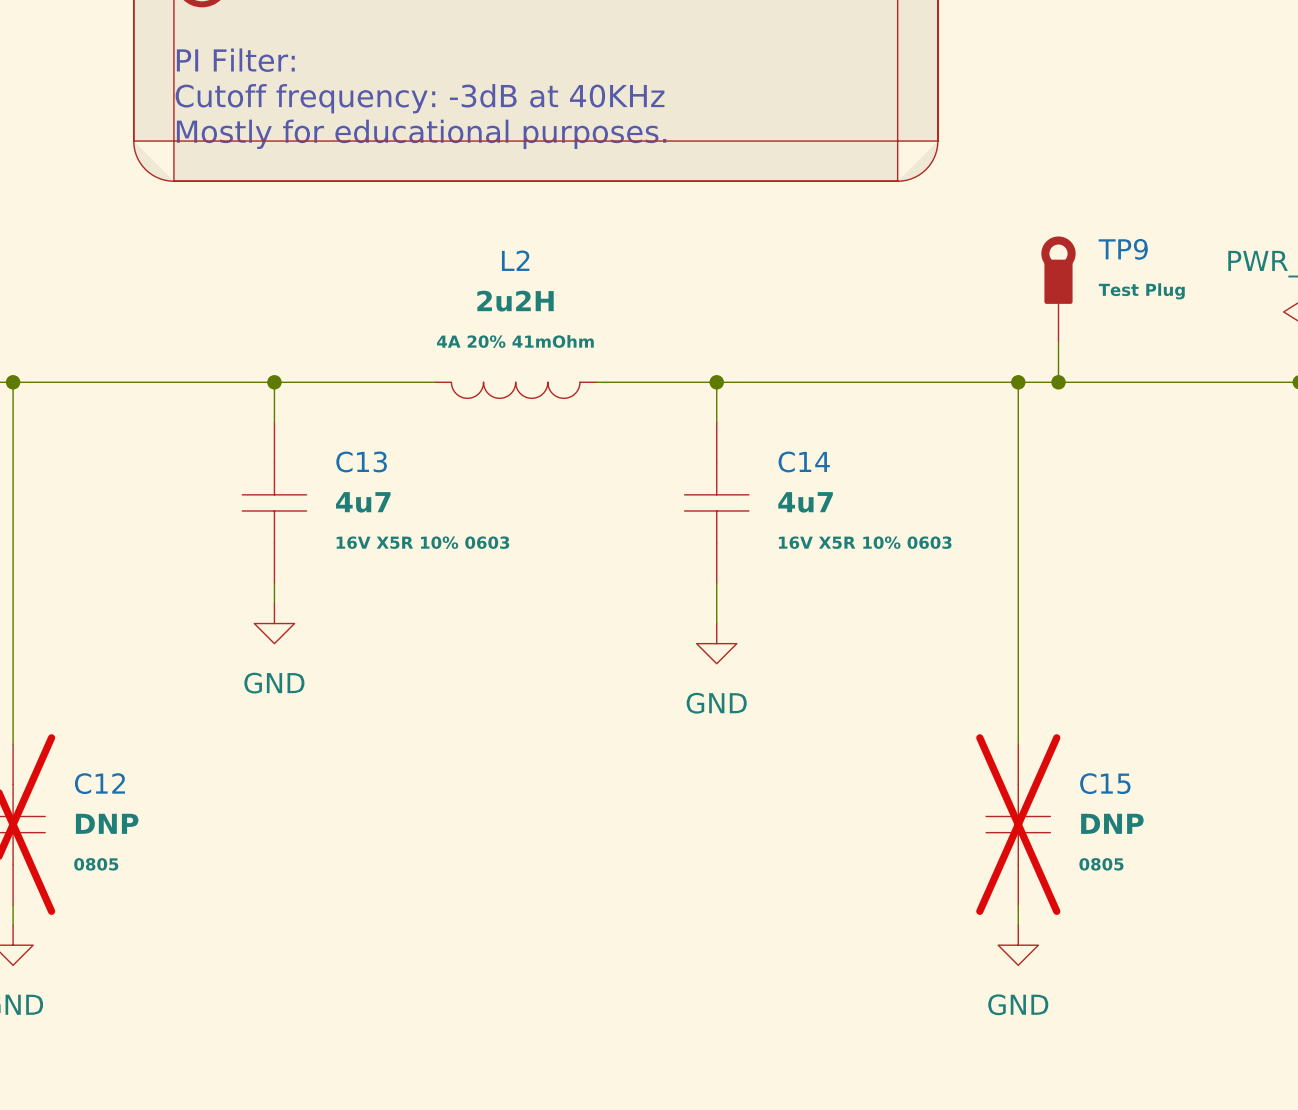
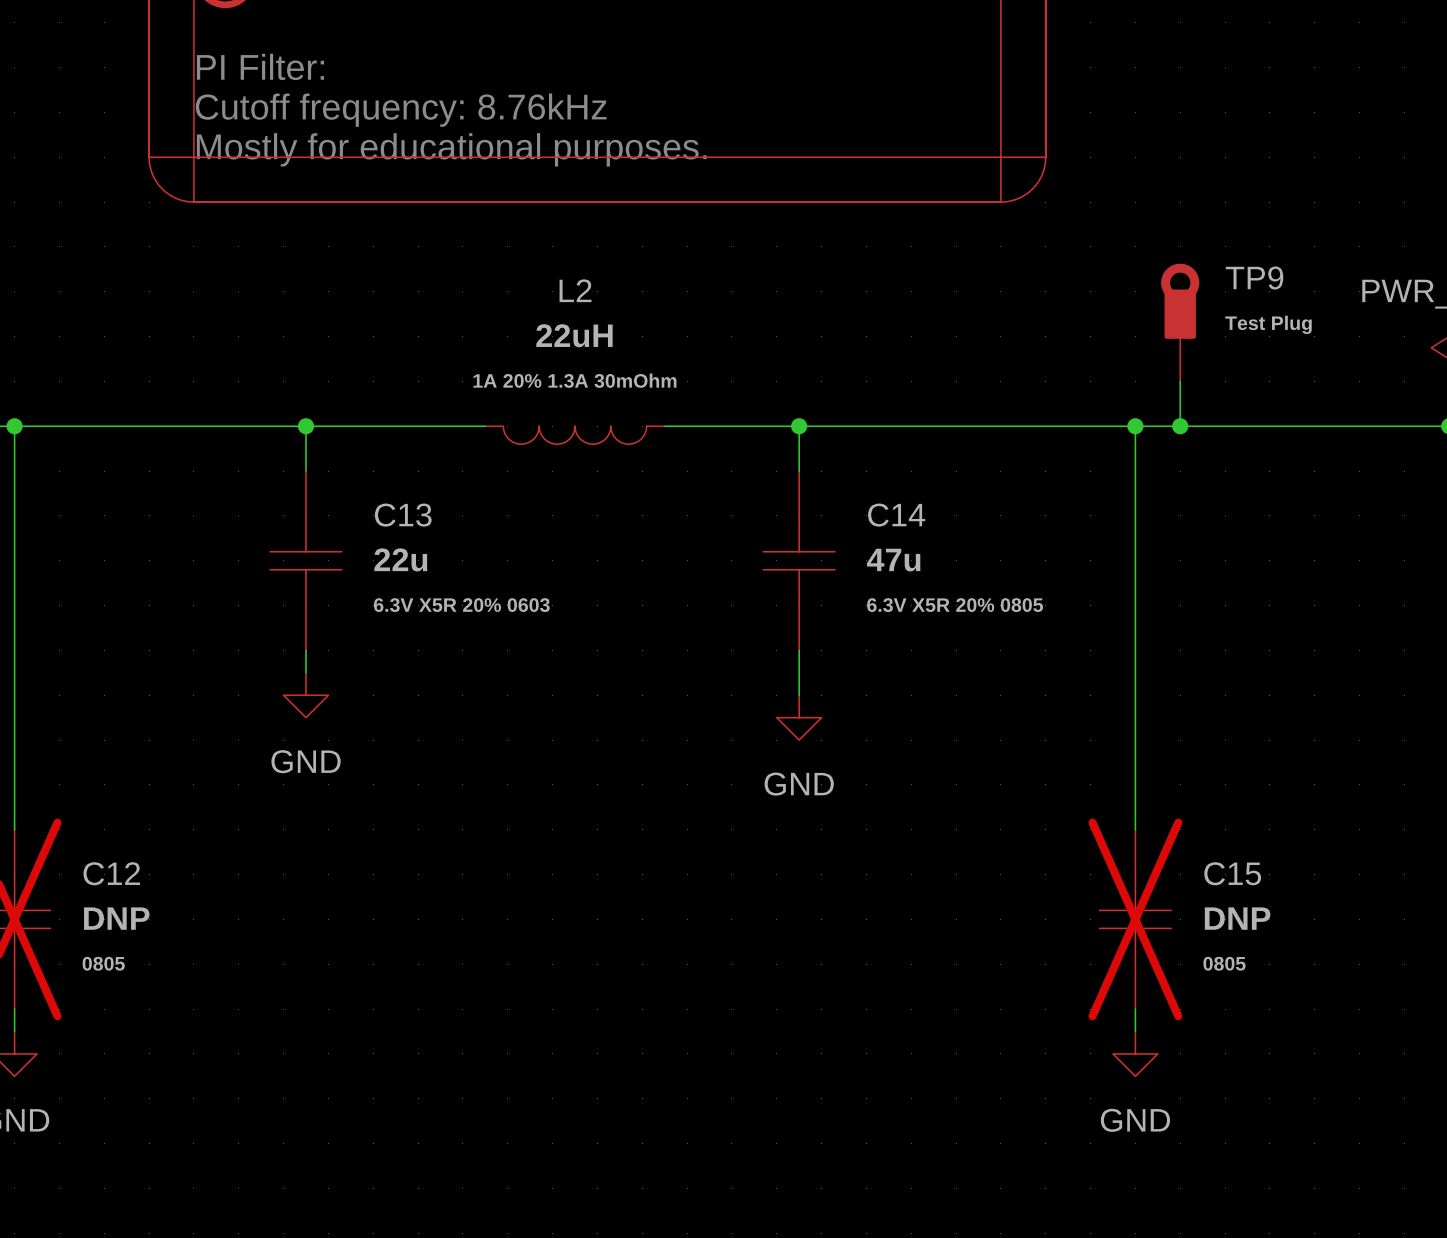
text: Cutoff frequency: -3dB at 40KHz (420, 98) -> Cutoff frequency: 8.76kHz (401, 110)
L2 value: 2u2H (515, 301) -> 22uH (574, 335)
L2 text: 4A 20% 41mOhm (515, 341) -> 1A 20% 1.3A 30mOhm (575, 380)
C13 value: 4u7 (363, 502) -> 22u (400, 559)
C14 value: 4u7 (805, 502) -> 47u (893, 560)
C13 text: 16V X5R 10% 0603 (422, 542) -> 6.3V X5R 20% 0603 (461, 605)
C14 text: 16V X5R 10% 0603 (865, 542) -> 6.3V X5R 20% 0805 (955, 605)

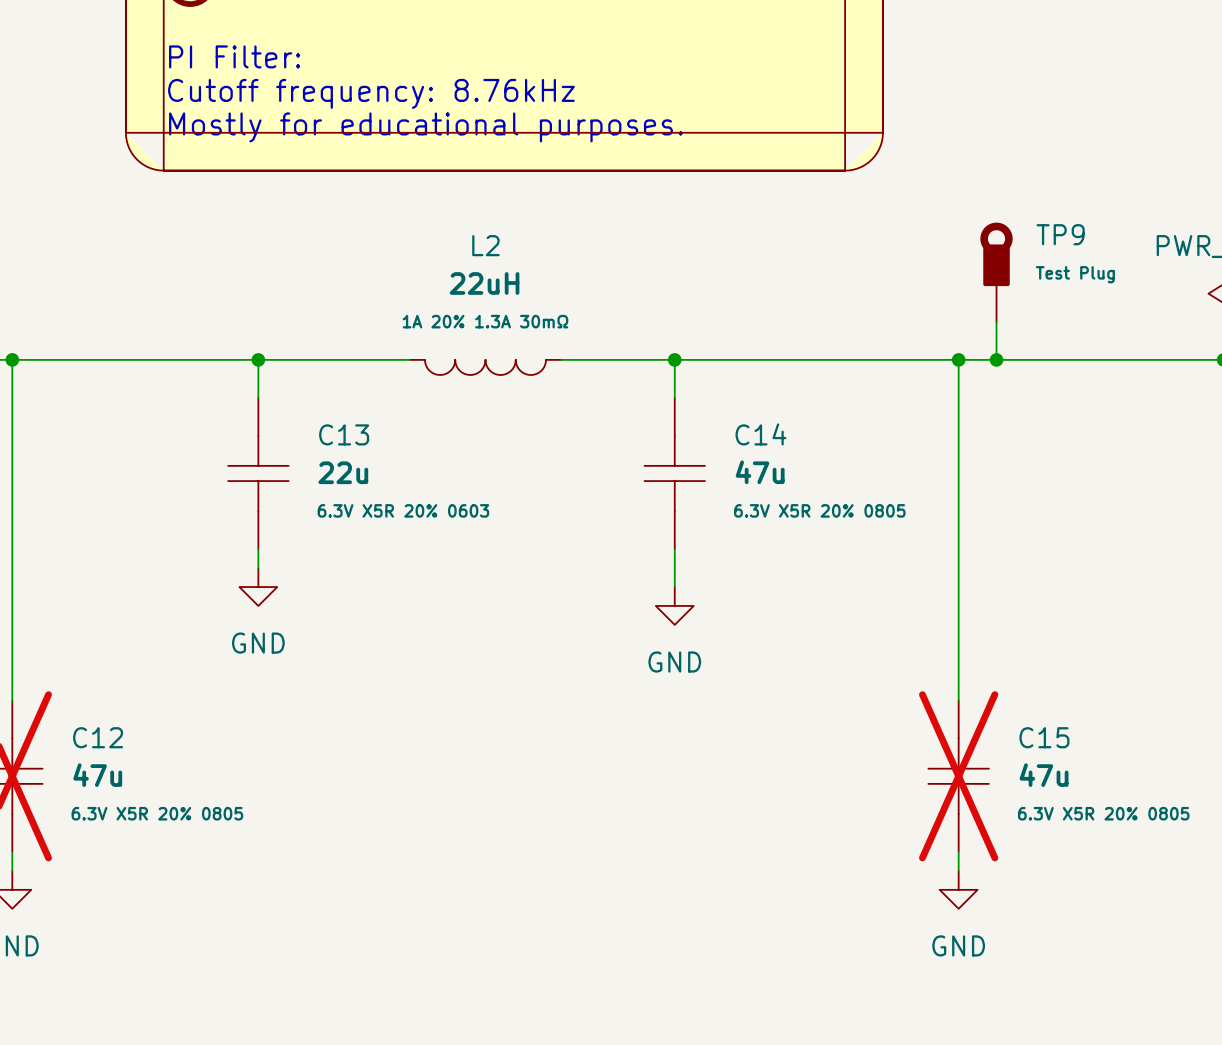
L2 text: 1A 20% 1.3A 30mOhm (575, 380) -> 1A 20% 1.3A 30mΩ (485, 321)
C12 value: DNP (116, 918) -> 47u (97, 775)
C15 value: DNP (1237, 918) -> 47u (1044, 775)
C12 text: 0805 (103, 963) -> 6.3V X5R 20% 0805 (157, 813)
C15 text: 0805 (1224, 963) -> 6.3V X5R 20% 0805 (1103, 813)

